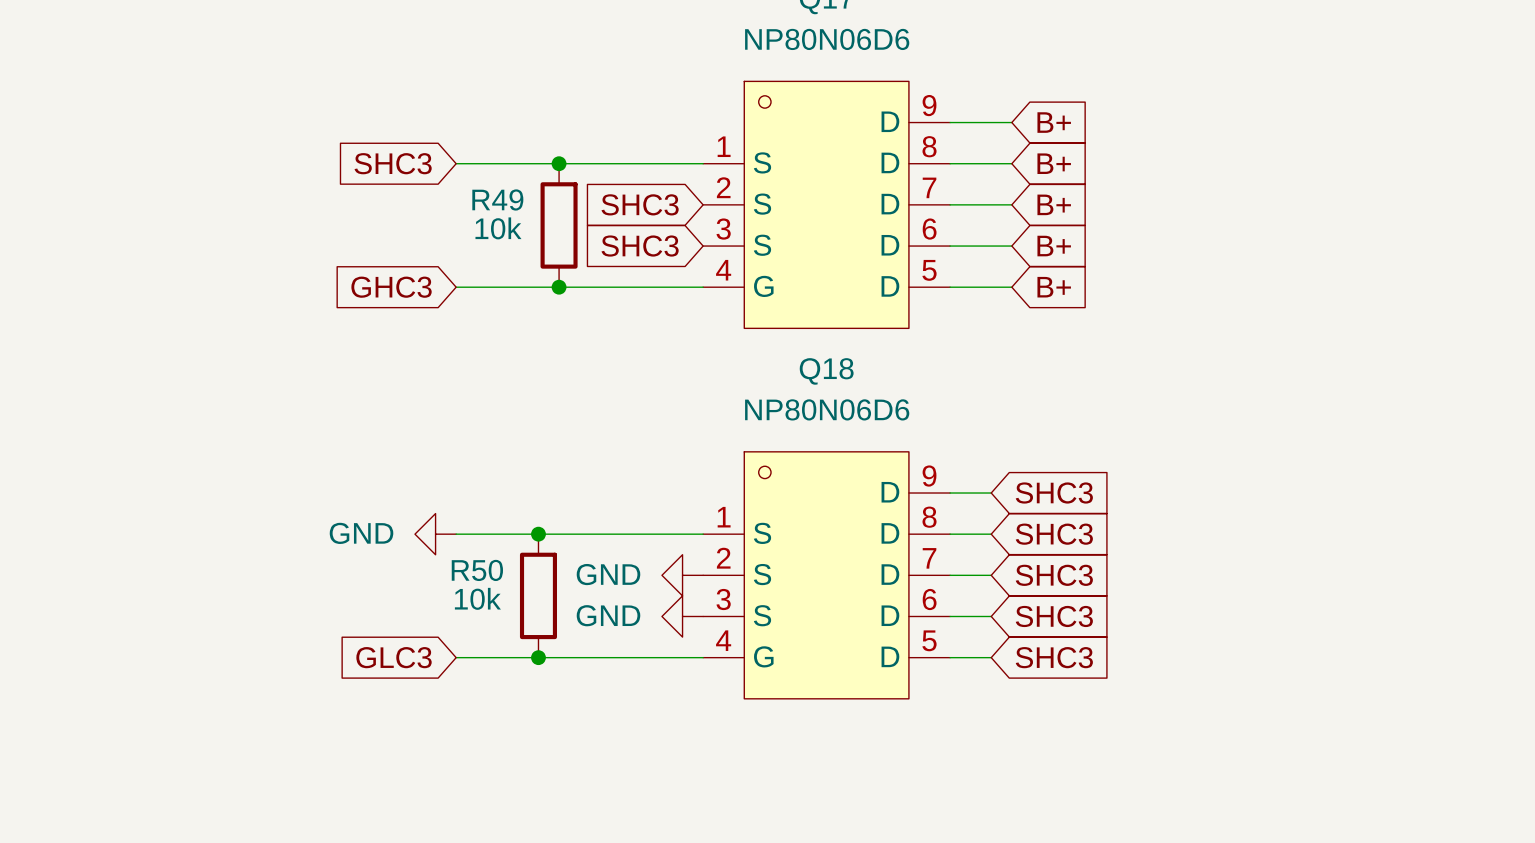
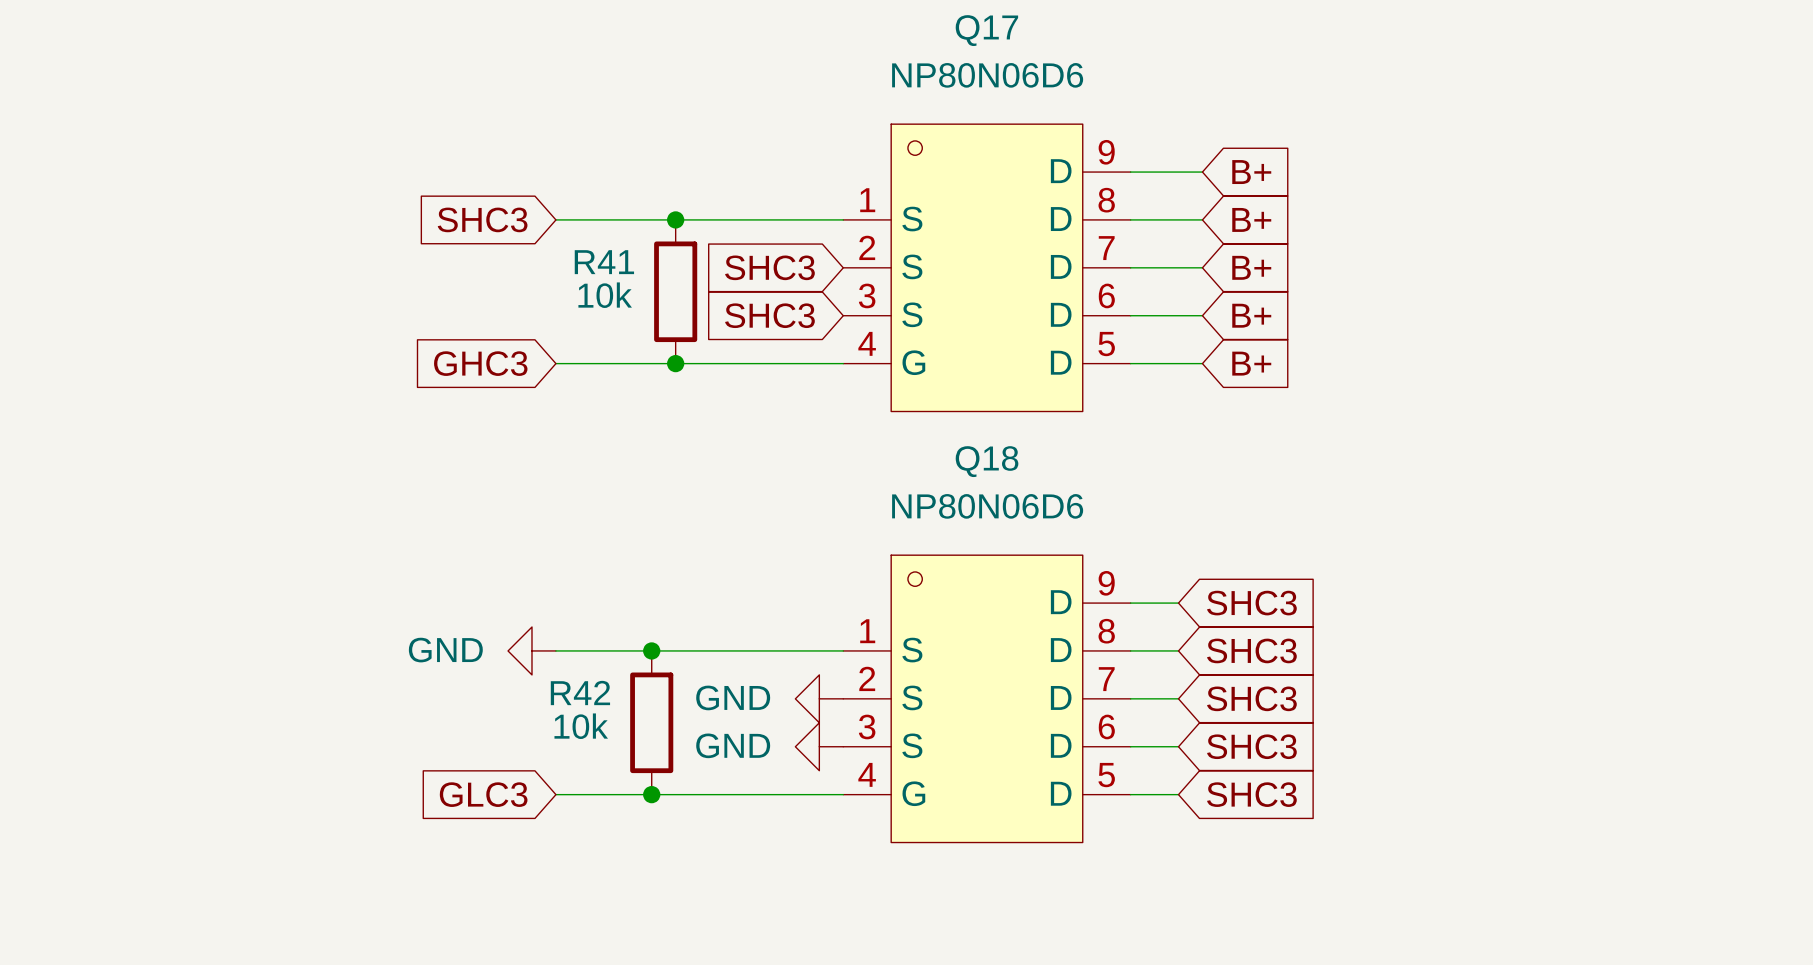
R49 name: R49 (497, 199) -> R41 (604, 262)
R50 name: R50 (477, 570) -> R42 (580, 692)

